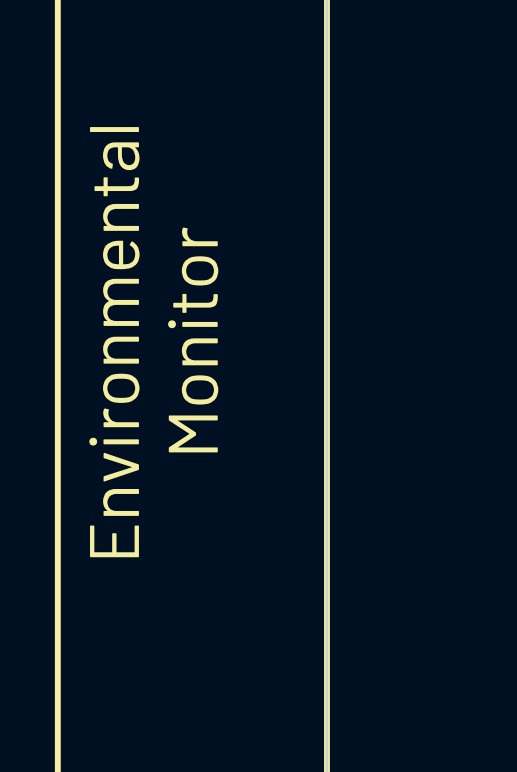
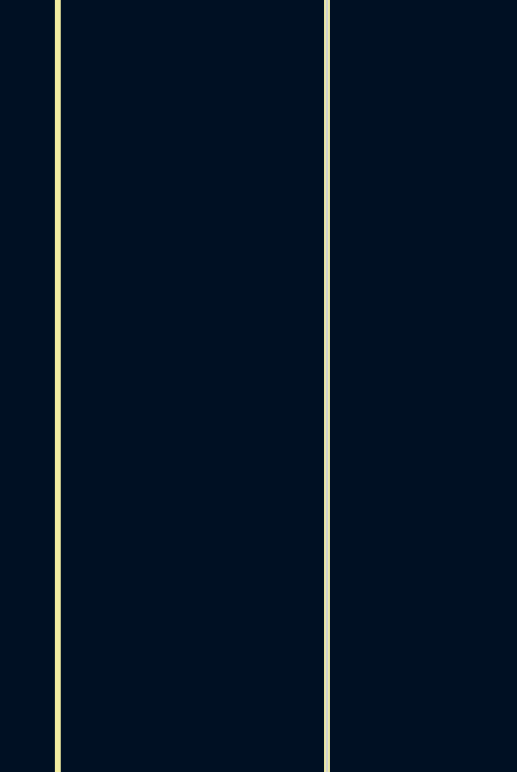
text: Monitor (193, 339) -> none
text: Environmental (114, 342) -> none

